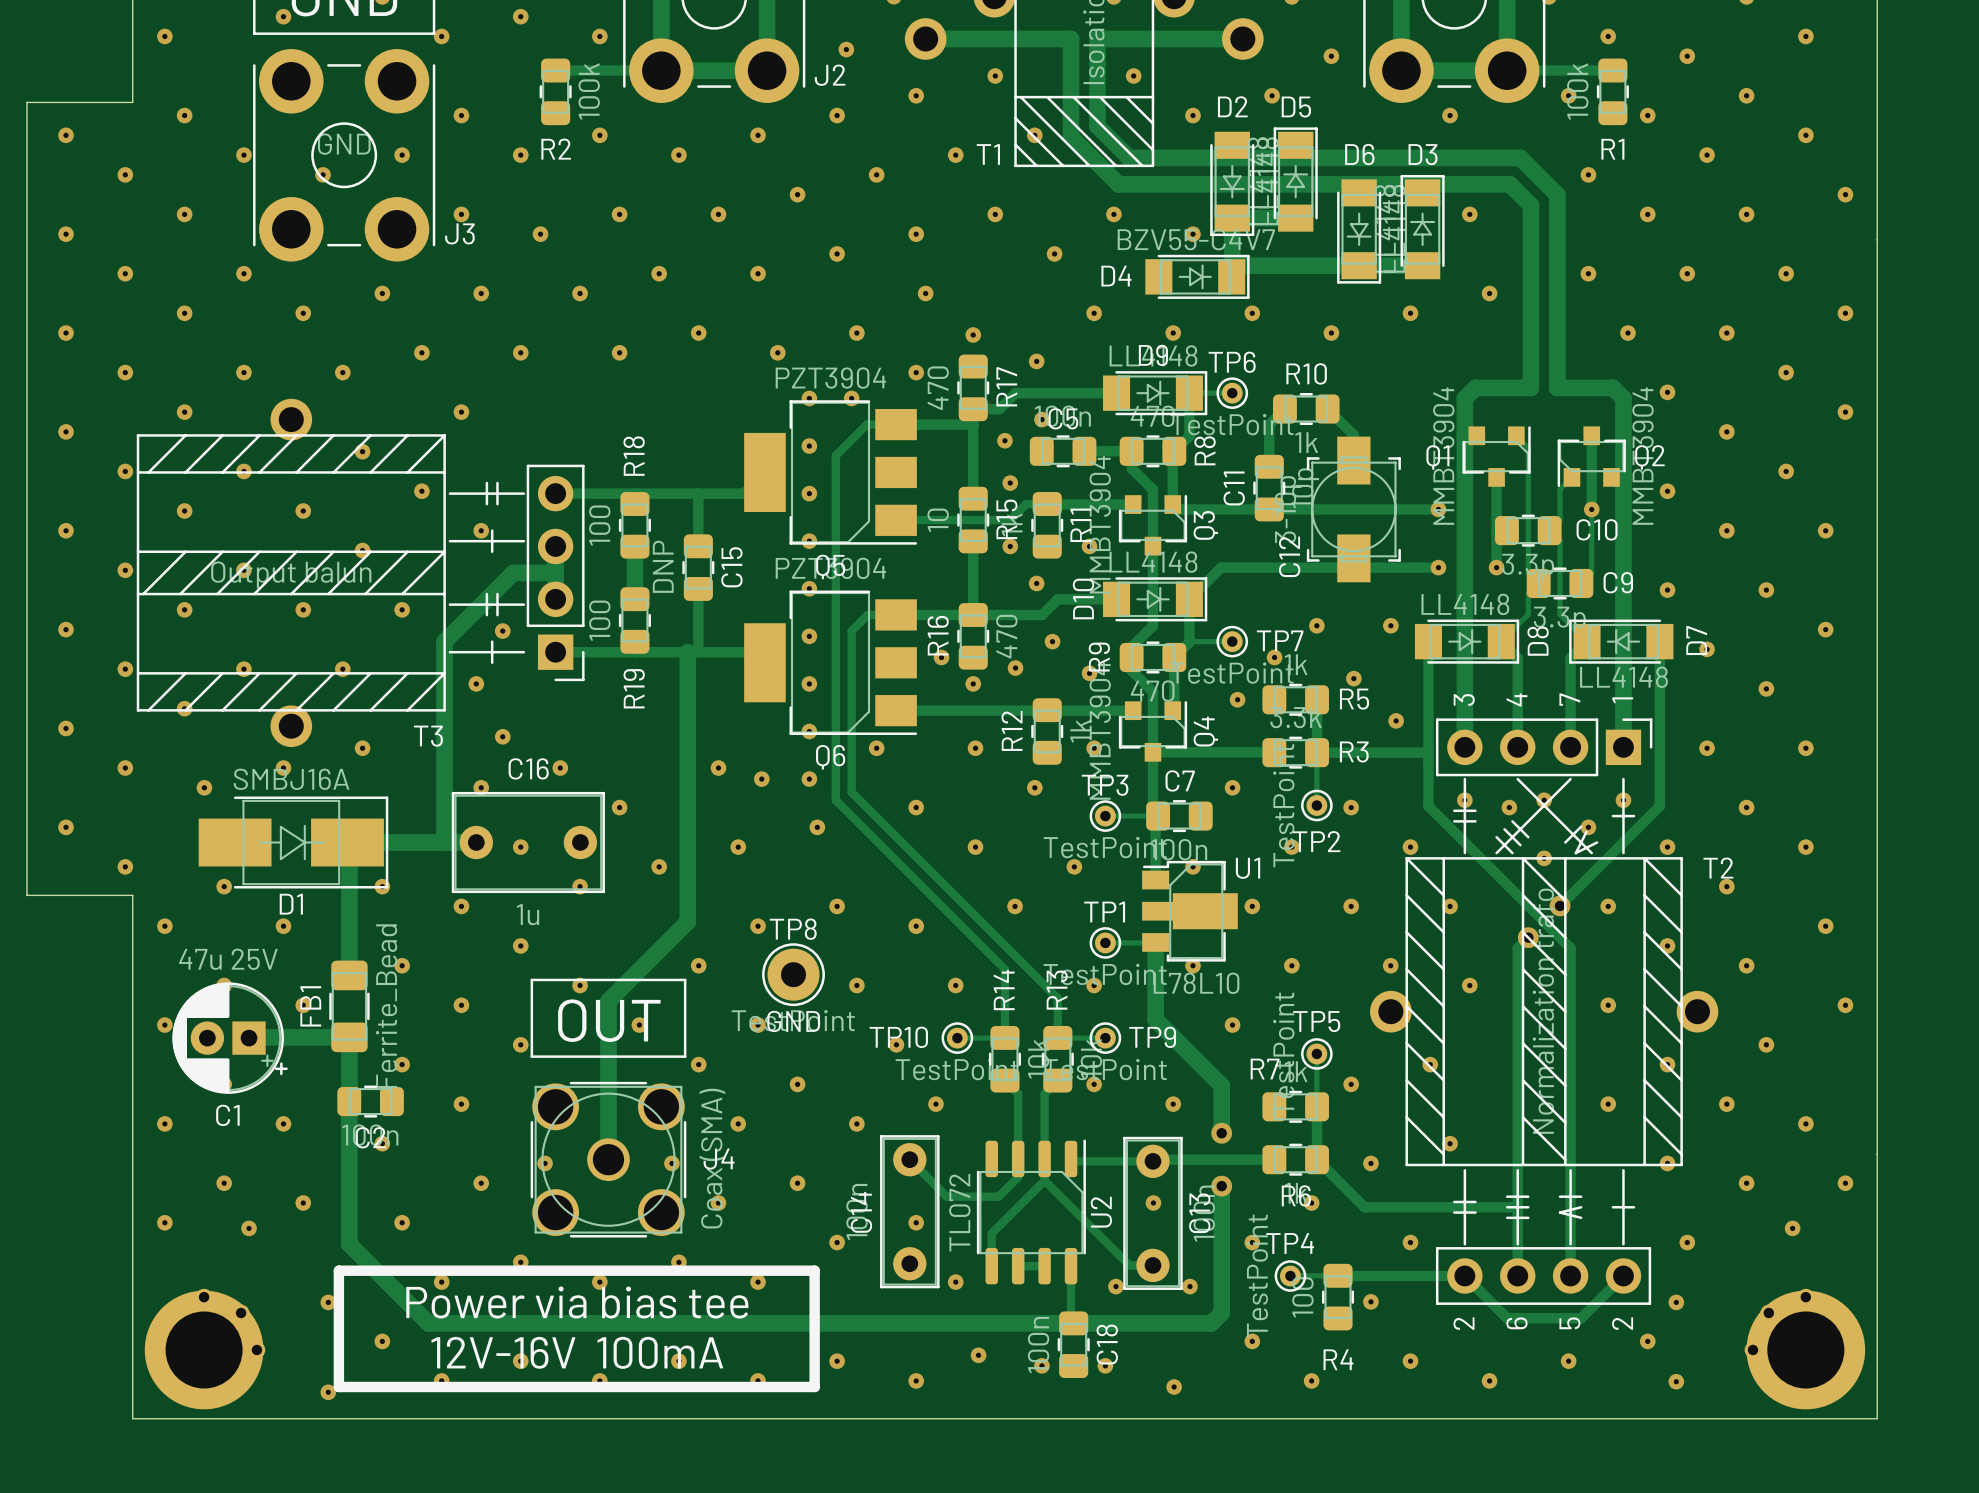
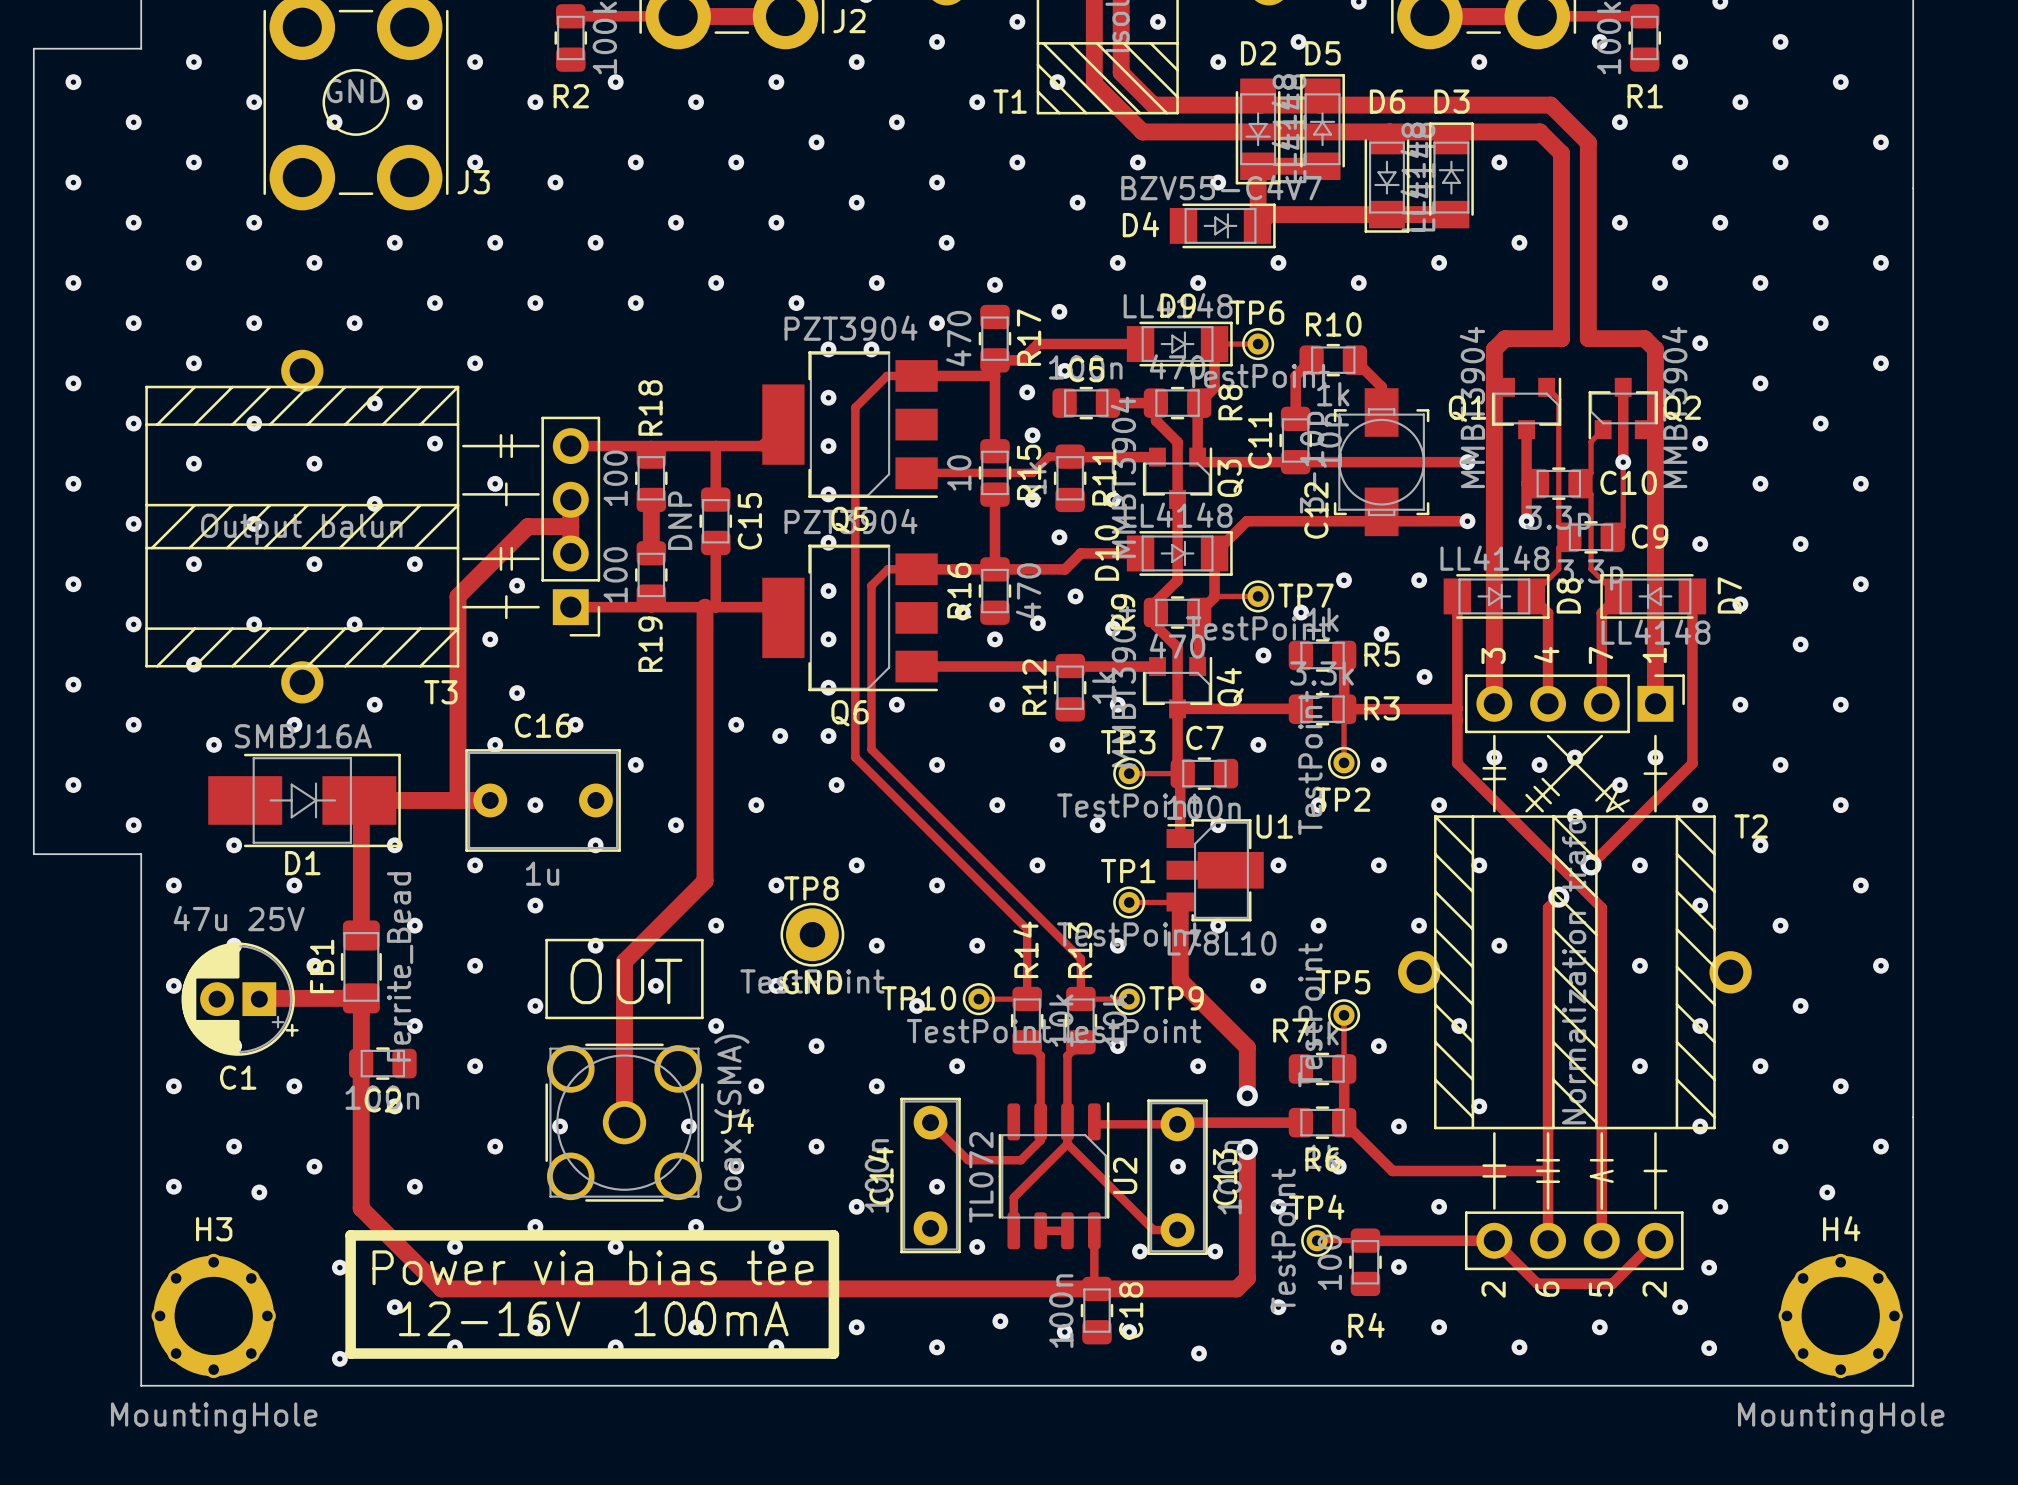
part: (205, 1349) -> none
part: (1804, 1349) -> none
H3: none -> MountingHole (213, 1315)
H4: none -> MountingHole (1840, 1315)
text: 12V-16V 100mA (577, 1352) -> 12-16V 100mA (593, 1318)

